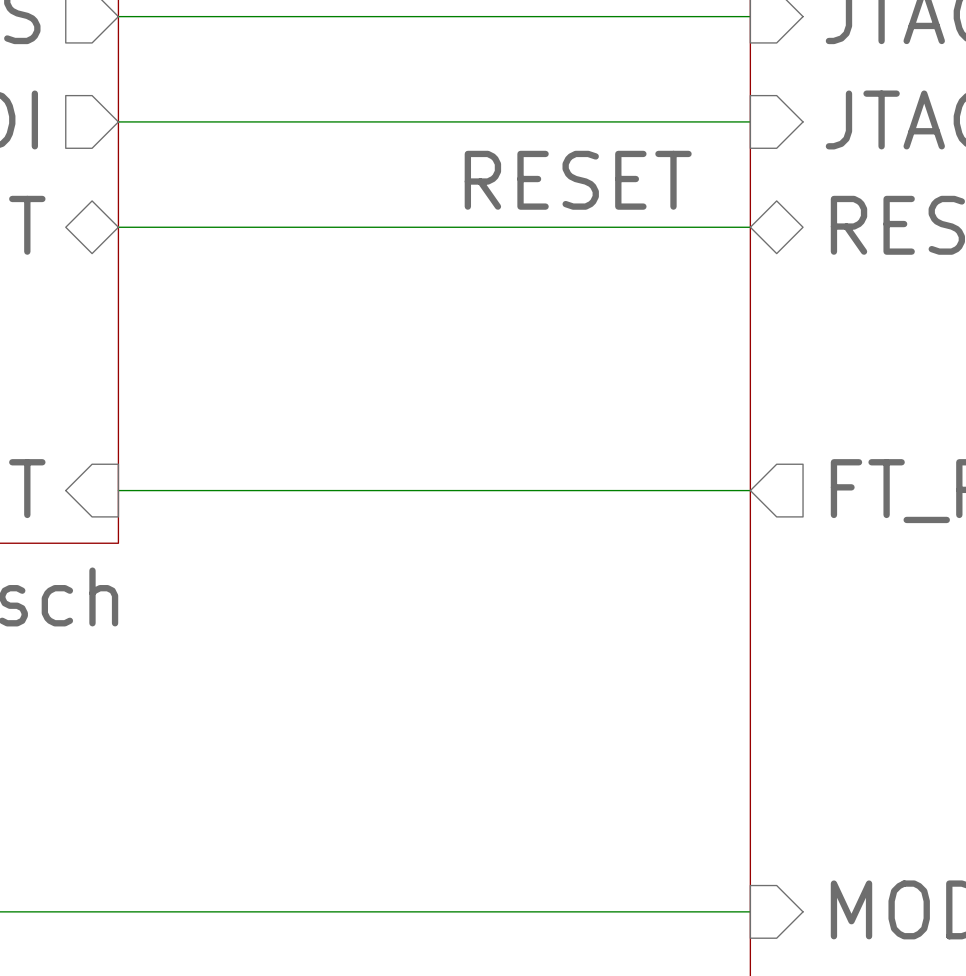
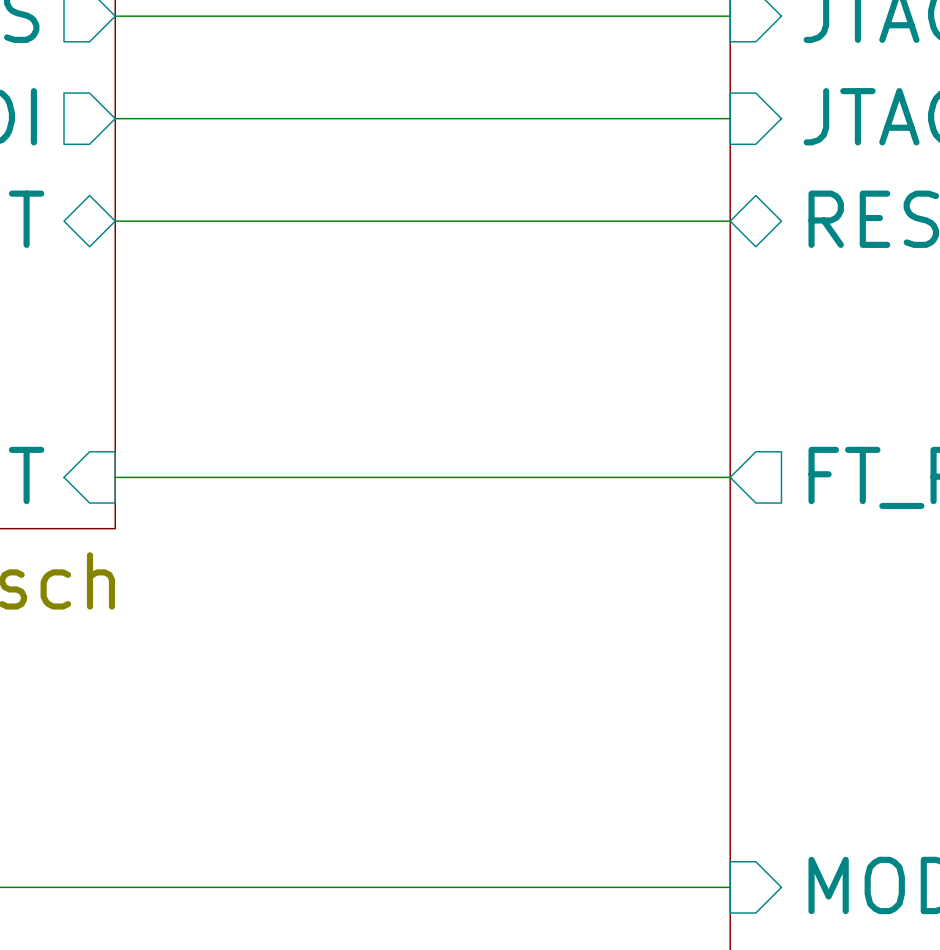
label: RESET (578, 180) -> none

